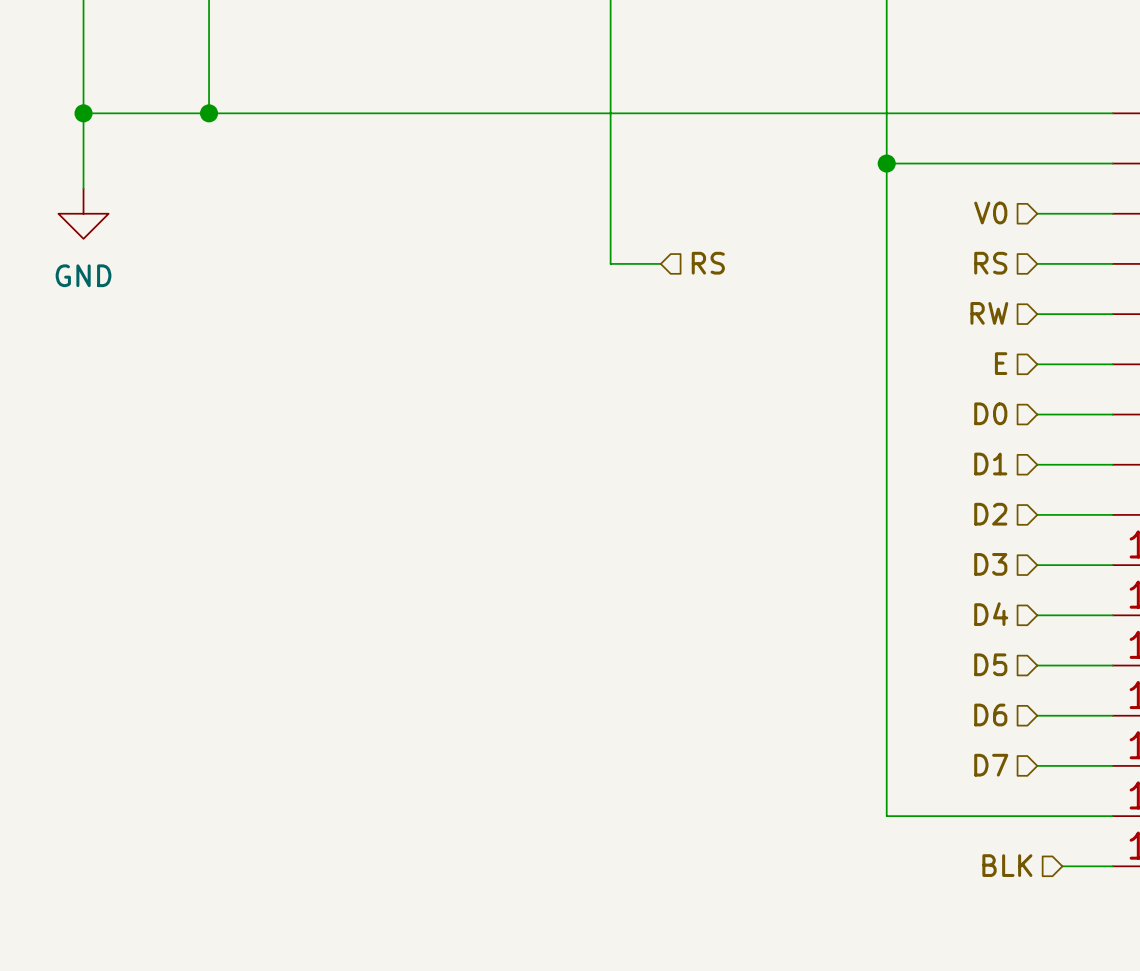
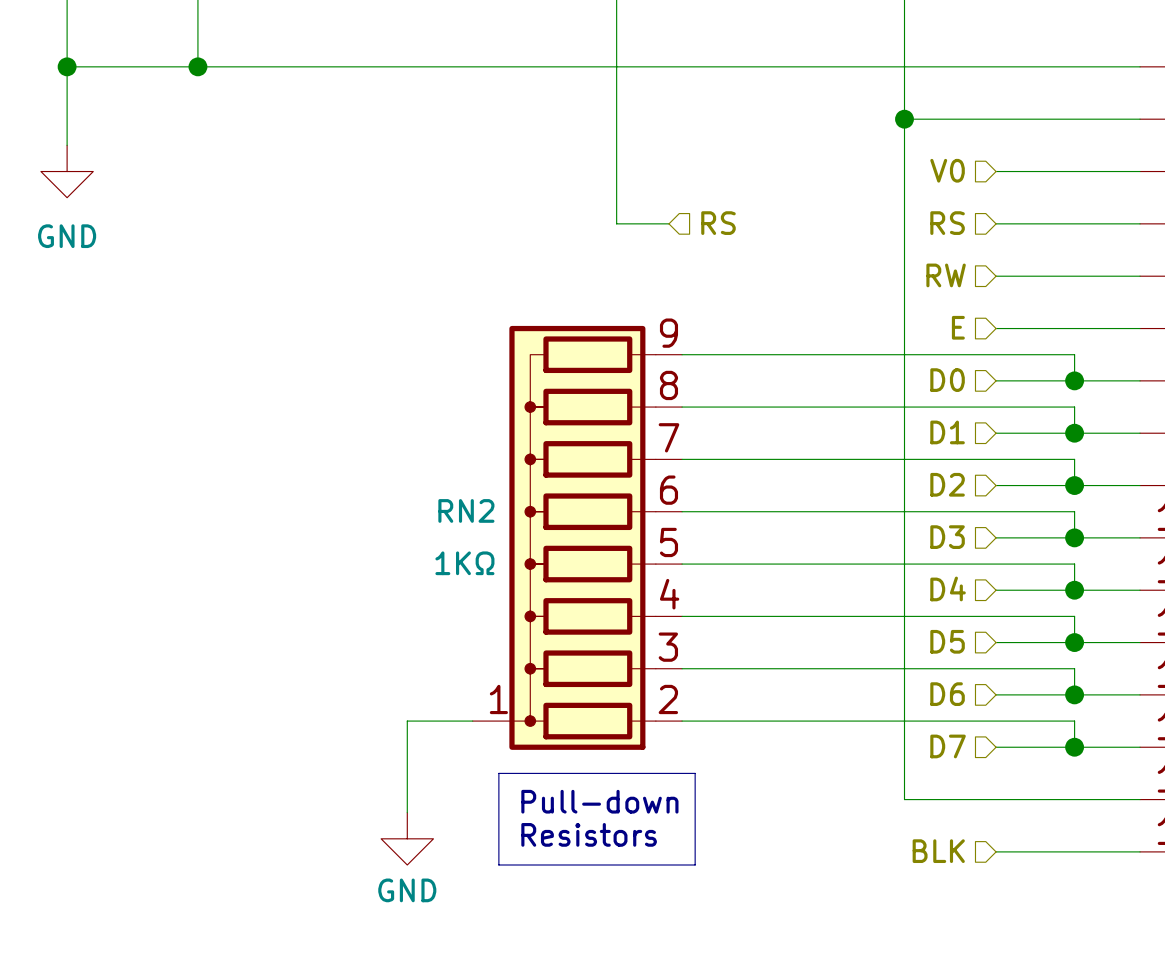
wire: none -> (996, 171) (1061, 171)
hierarchical label position: V0 (990, 213) -> V0 (947, 170)
wire: none -> (996, 223) (1061, 223)
hierarchical label position: RS (990, 263) -> RS (947, 223)
hierarchical label position: RW (989, 313) -> RW (946, 275)
wire: none -> (996, 276) (1061, 276)
hierarchical label position: E (1001, 363) -> E (958, 327)
wire: none -> (996, 328) (1061, 328)
wire: none -> (682, 354) (1074, 354) (1074, 380)
hierarchical label position: D0 (990, 413) -> D0 (947, 380)
wire: none -> (996, 380) (1061, 380)
junction: none -> (1074, 380)
wire: none -> (682, 407) (1074, 407) (1074, 433)
wire: none -> (996, 433) (1061, 433)
hierarchical label position: D1 (990, 464) -> D1 (947, 432)
junction: none -> (1074, 433)
wire: none -> (682, 459) (1074, 459) (1074, 485)
wire: none -> (996, 485) (1061, 485)
hierarchical label position: D2 (990, 514) -> D2 (947, 484)
junction: none -> (1074, 485)
wire: none -> (682, 511) (1074, 511) (1074, 537)
hierarchical label position: D3 (990, 564) -> D3 (947, 537)
RN2: none -> 1KΩ (577, 537)
wire: none -> (996, 537) (1061, 537)
junction: none -> (1074, 537)
wire: none -> (682, 564) (1074, 564) (1074, 590)
hierarchical label position: D4 (991, 614) -> D4 (948, 588)
wire: none -> (996, 590) (1061, 590)
junction: none -> (1074, 590)
wire: none -> (682, 616) (1074, 616) (1074, 642)
hierarchical label position: D5 (990, 664) -> D5 (947, 641)
wire: none -> (996, 642) (1061, 642)
junction: none -> (1074, 642)
wire: none -> (682, 668) (1074, 668) (1074, 694)
hierarchical label position: D6 (990, 714) -> D6 (947, 694)
wire: none -> (996, 694) (1061, 694)
junction: none -> (1074, 694)
wire: none -> (472, 721) (407, 721) (407, 812)
wire: none -> (682, 721) (1074, 721) (1074, 747)
wire: none -> (996, 747) (1061, 747)
hierarchical label position: D7 (991, 765) -> D7 (948, 746)
junction: none -> (1074, 747)
line: none -> (498, 773) (695, 773) (695, 864) (498, 864) (498, 773)
text: none -> Pull-down (599, 801)
text: none -> Resistors (589, 834)
power symbol: none -> GND (407, 838)
hierarchical label position: BLK (1007, 865) -> BLK (938, 851)
wire: none -> (996, 851) (1087, 851)

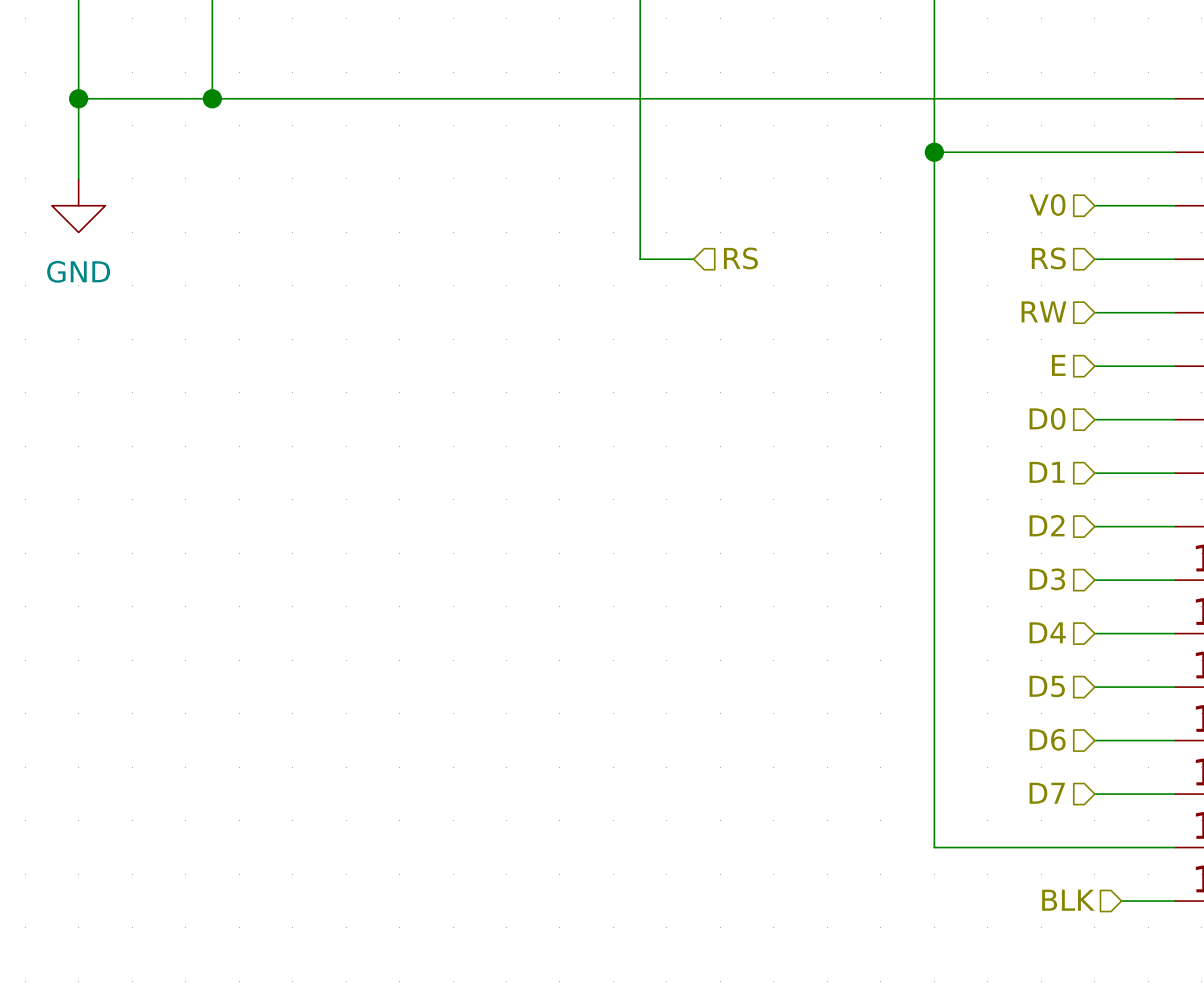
hierarchical label position: V0 (947, 170) -> V0 (1047, 204)
wire: (996, 171) (1061, 171) -> none
hierarchical label position: RS (947, 223) -> RS (1048, 258)
wire: (996, 223) (1061, 223) -> none
hierarchical label position: RW (946, 275) -> RW (1044, 311)
wire: (996, 276) (1061, 276) -> none
hierarchical label position: E (958, 327) -> E (1058, 365)
wire: (996, 328) (1061, 328) -> none
wire: (682, 354) (1074, 354) (1074, 380) -> none
hierarchical label position: D0 (947, 380) -> D0 (1047, 418)
wire: (996, 380) (1061, 380) -> none
junction: (1074, 380) -> none
wire: (682, 407) (1074, 407) (1074, 433) -> none
hierarchical label position: D1 (947, 432) -> D1 (1047, 472)
wire: (996, 433) (1061, 433) -> none
junction: (1074, 433) -> none
wire: (682, 459) (1074, 459) (1074, 485) -> none
hierarchical label position: D2 (947, 484) -> D2 (1047, 525)
wire: (996, 485) (1061, 485) -> none
junction: (1074, 485) -> none
wire: (682, 511) (1074, 511) (1074, 537) -> none
RN2: 1KΩ (577, 537) -> none
hierarchical label position: D3 (947, 537) -> D3 (1047, 579)
wire: (996, 537) (1061, 537) -> none
junction: (1074, 537) -> none
wire: (682, 564) (1074, 564) (1074, 590) -> none
hierarchical label position: D4 (948, 588) -> D4 (1047, 632)
wire: (996, 590) (1061, 590) -> none
junction: (1074, 590) -> none
wire: (682, 616) (1074, 616) (1074, 642) -> none
hierarchical label position: D5 (947, 641) -> D5 (1047, 686)
wire: (996, 642) (1061, 642) -> none
junction: (1074, 642) -> none
wire: (682, 668) (1074, 668) (1074, 694) -> none
hierarchical label position: D6 (947, 694) -> D6 (1047, 739)
wire: (996, 694) (1061, 694) -> none
junction: (1074, 694) -> none
wire: (472, 721) (407, 721) (407, 812) -> none
wire: (682, 721) (1074, 721) (1074, 747) -> none
hierarchical label position: D7 (948, 746) -> D7 (1047, 793)
wire: (996, 747) (1061, 747) -> none
junction: (1074, 747) -> none
line: (498, 773) (695, 773) (695, 864) (498, 864) (498, 773) -> none
text: Pull-down (599, 801) -> none
text: Resistors (589, 834) -> none
power symbol: GND (407, 838) -> none
hierarchical label position: BLK (938, 851) -> BLK (1068, 900)
wire: (996, 851) (1087, 851) -> none

